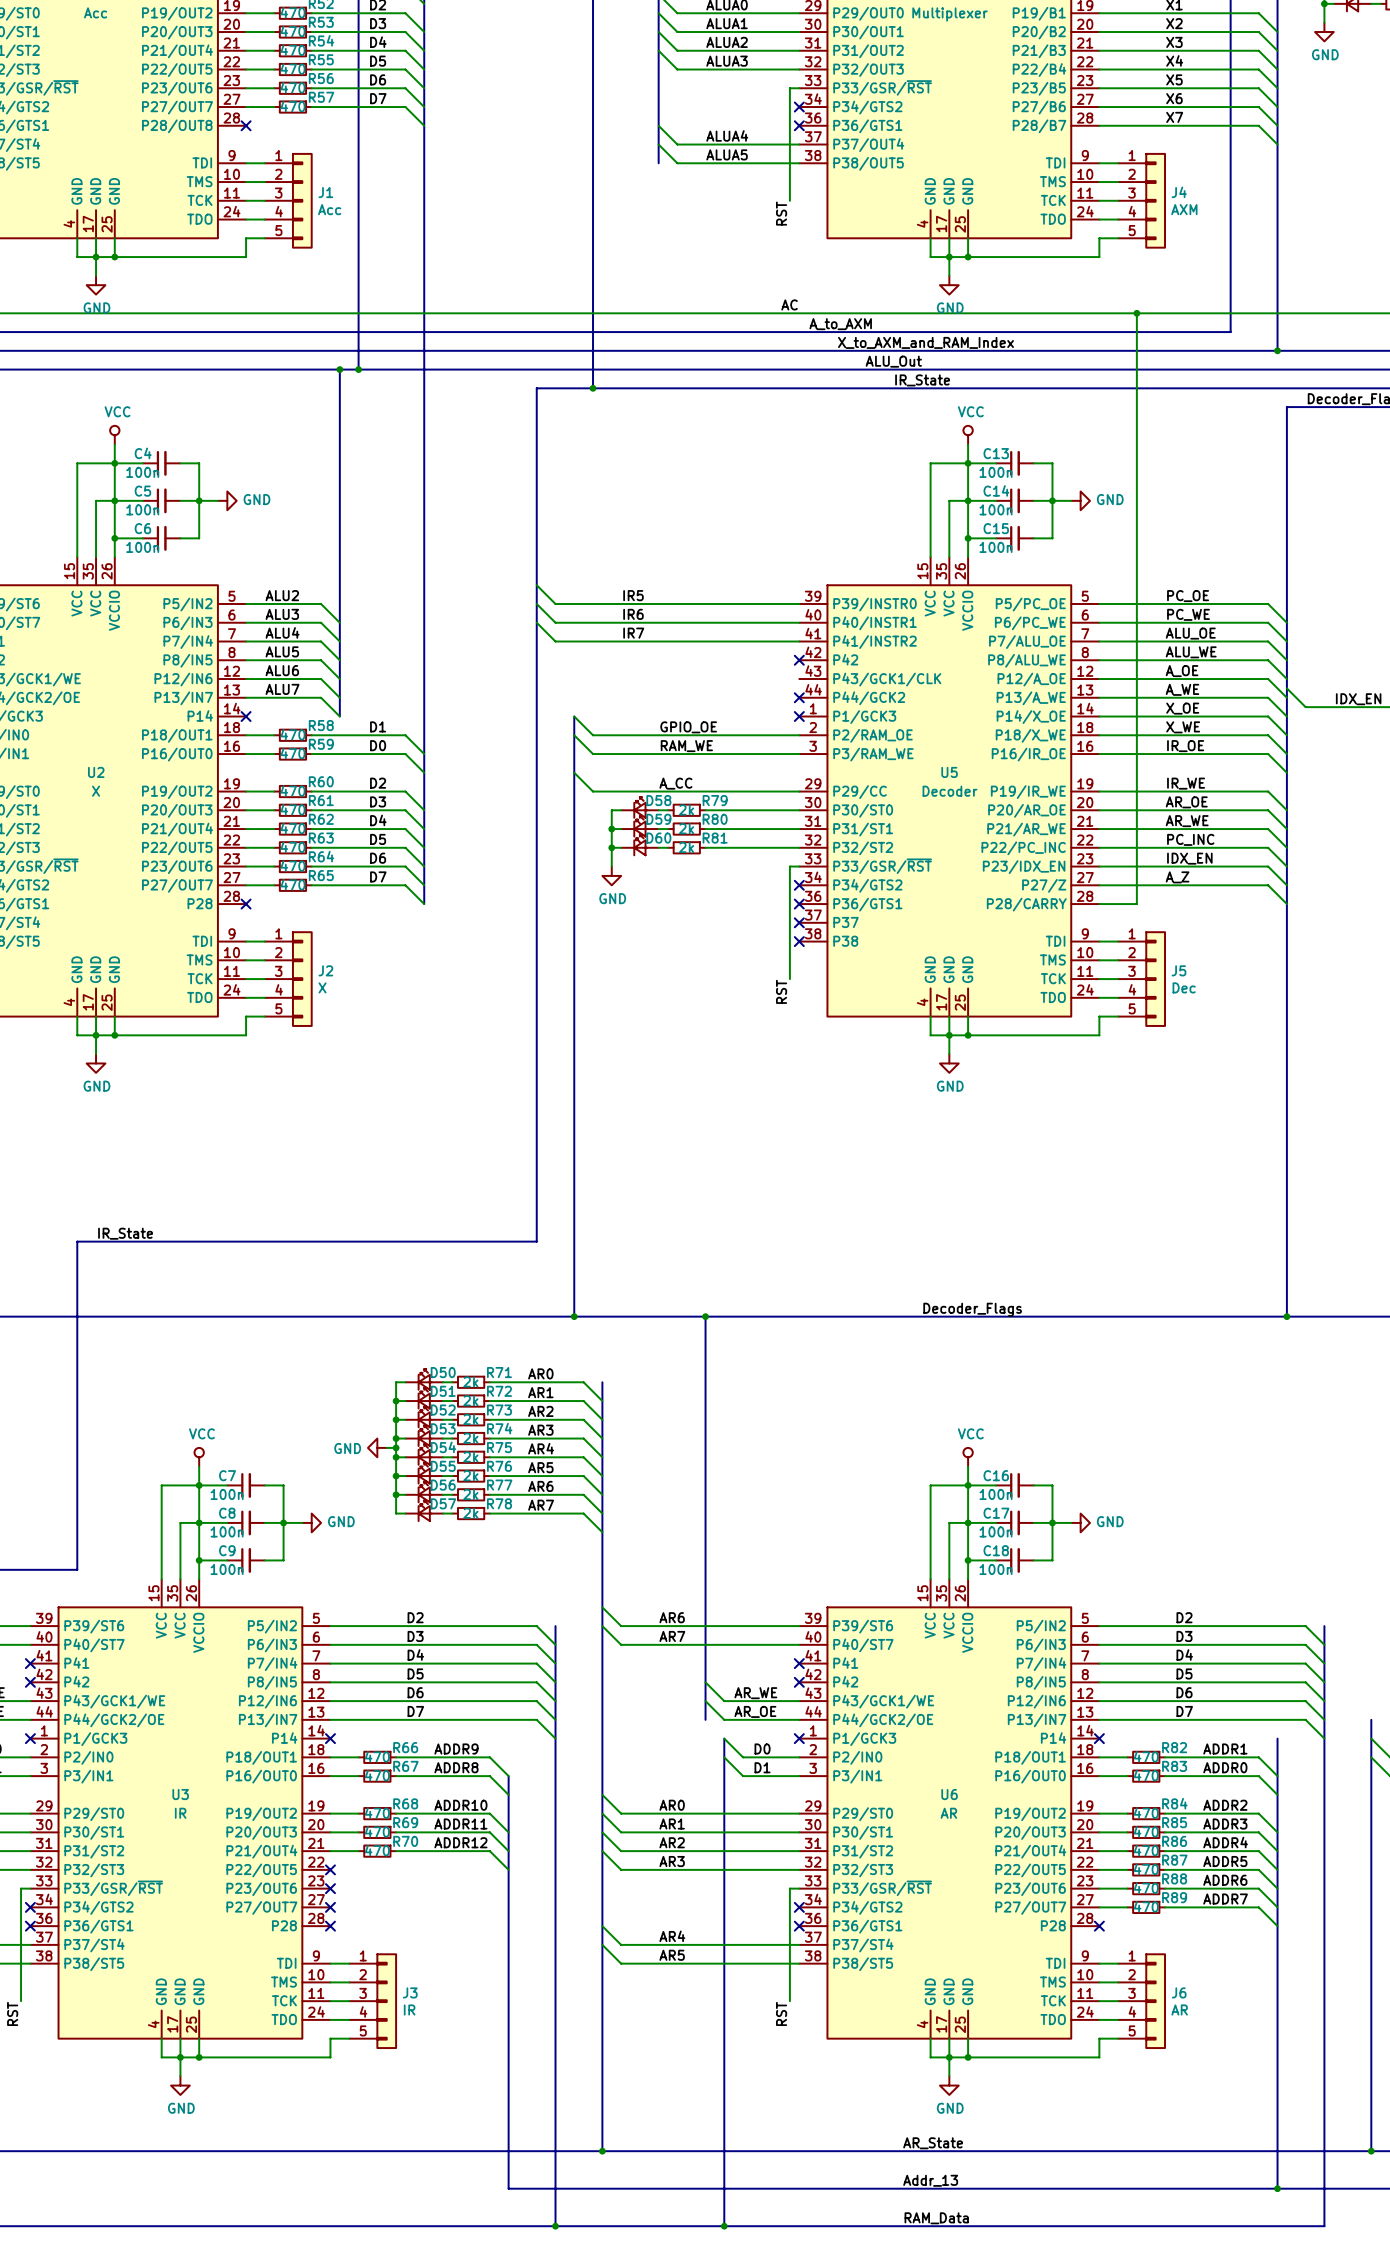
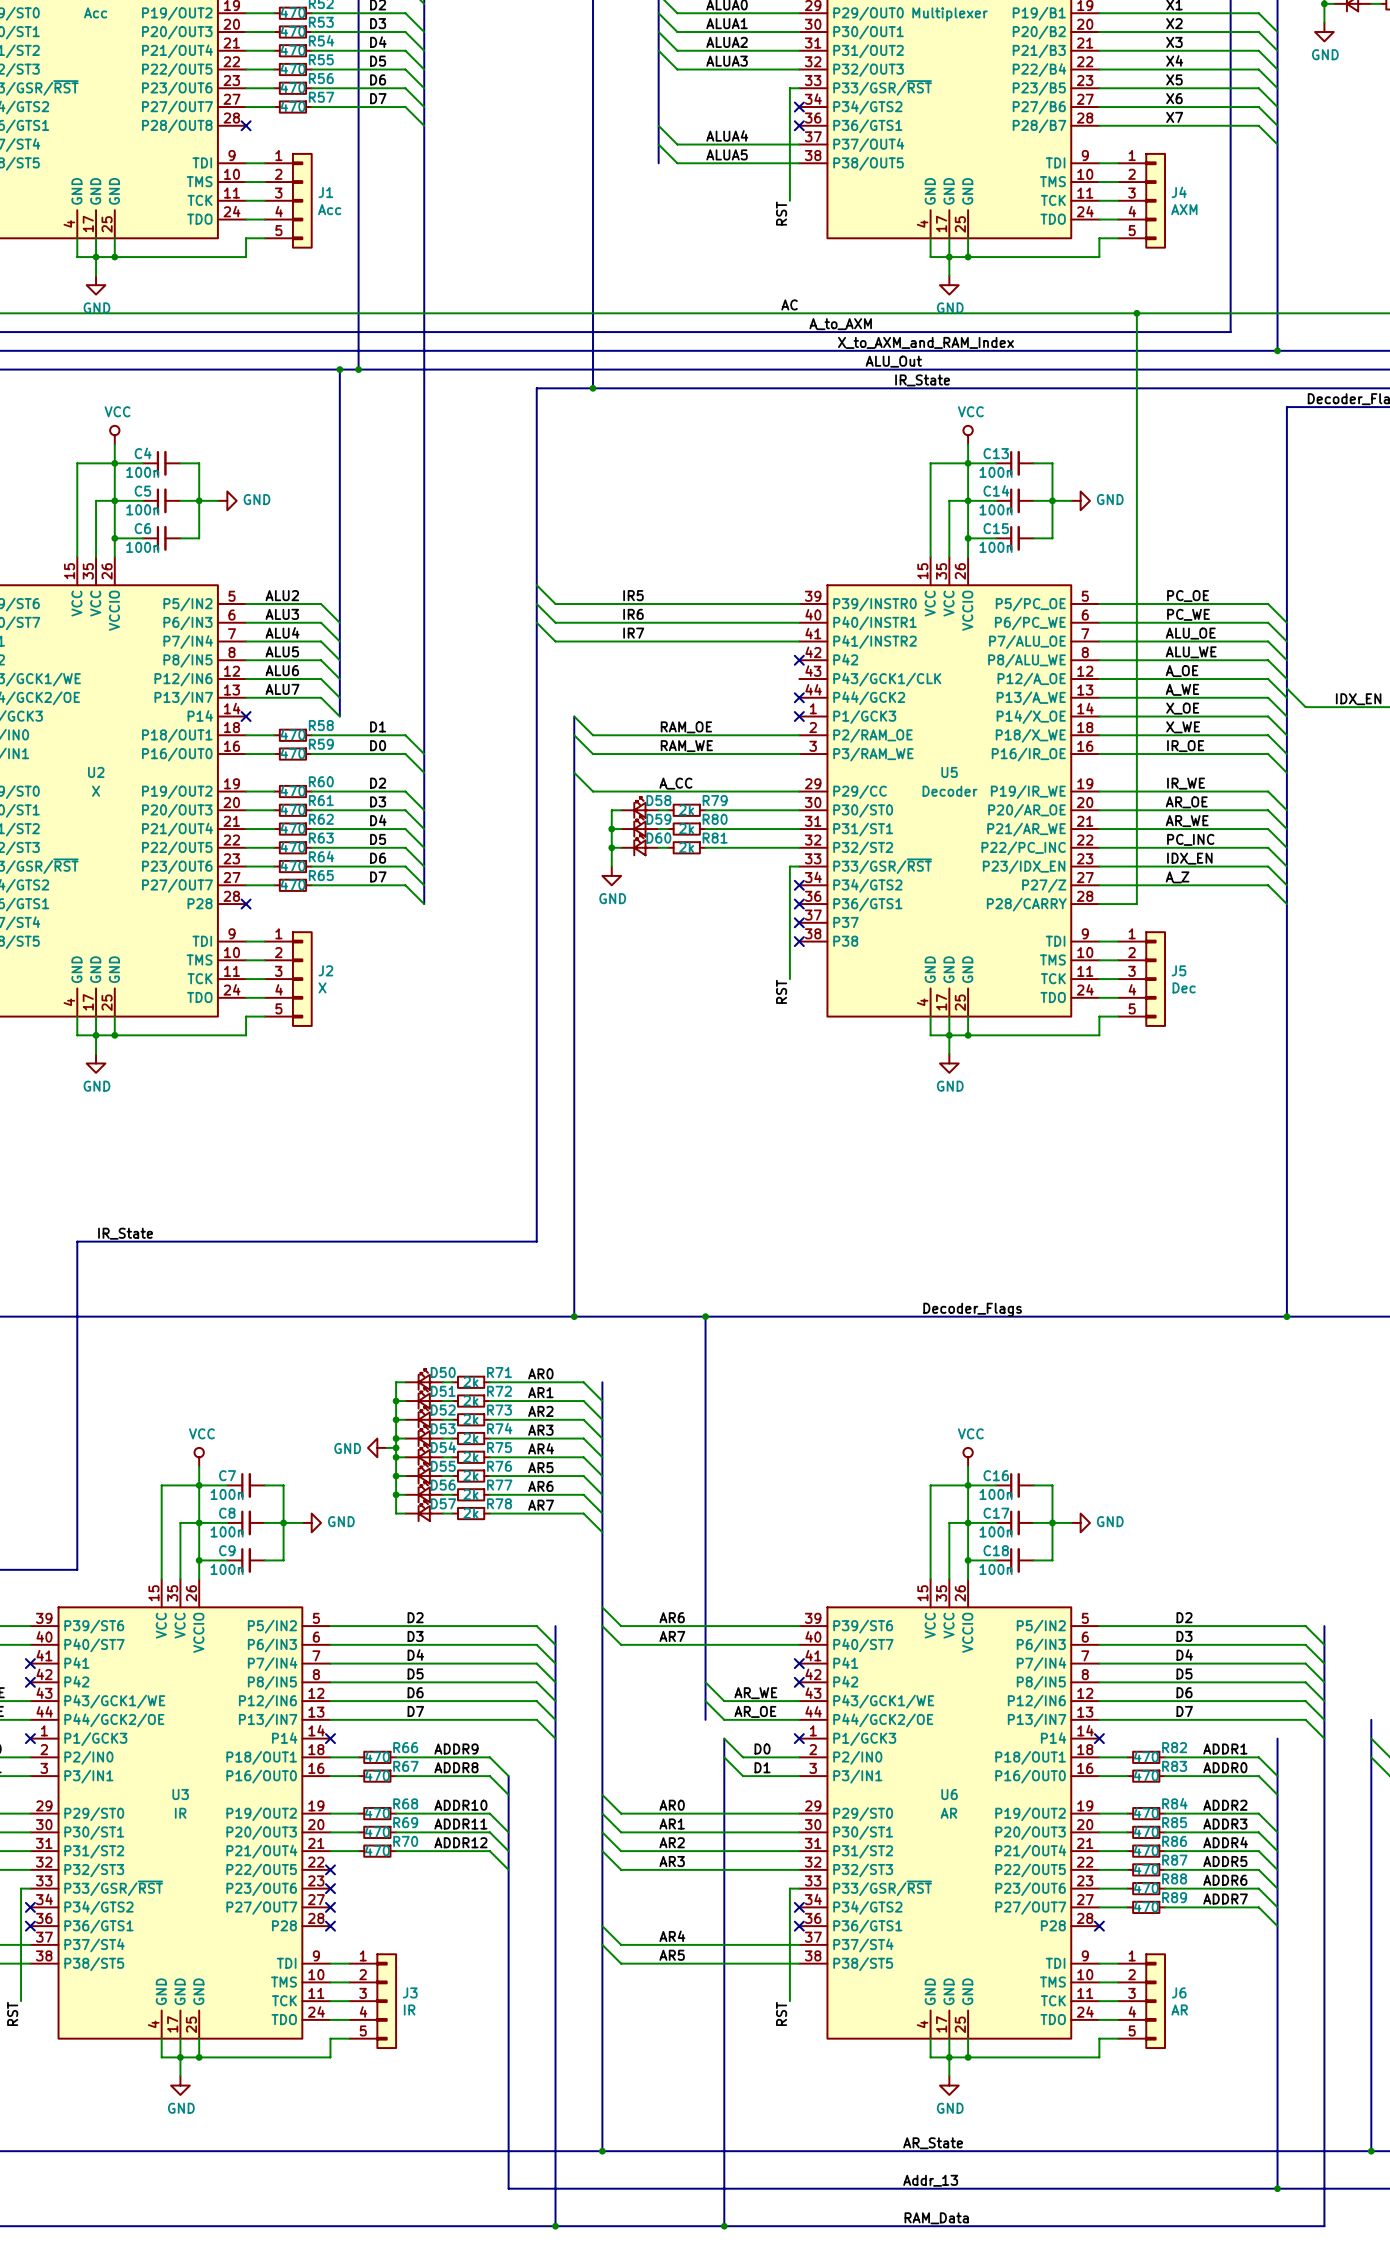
label: GPIO_OE (688, 727) -> RAM_OE (686, 727)

